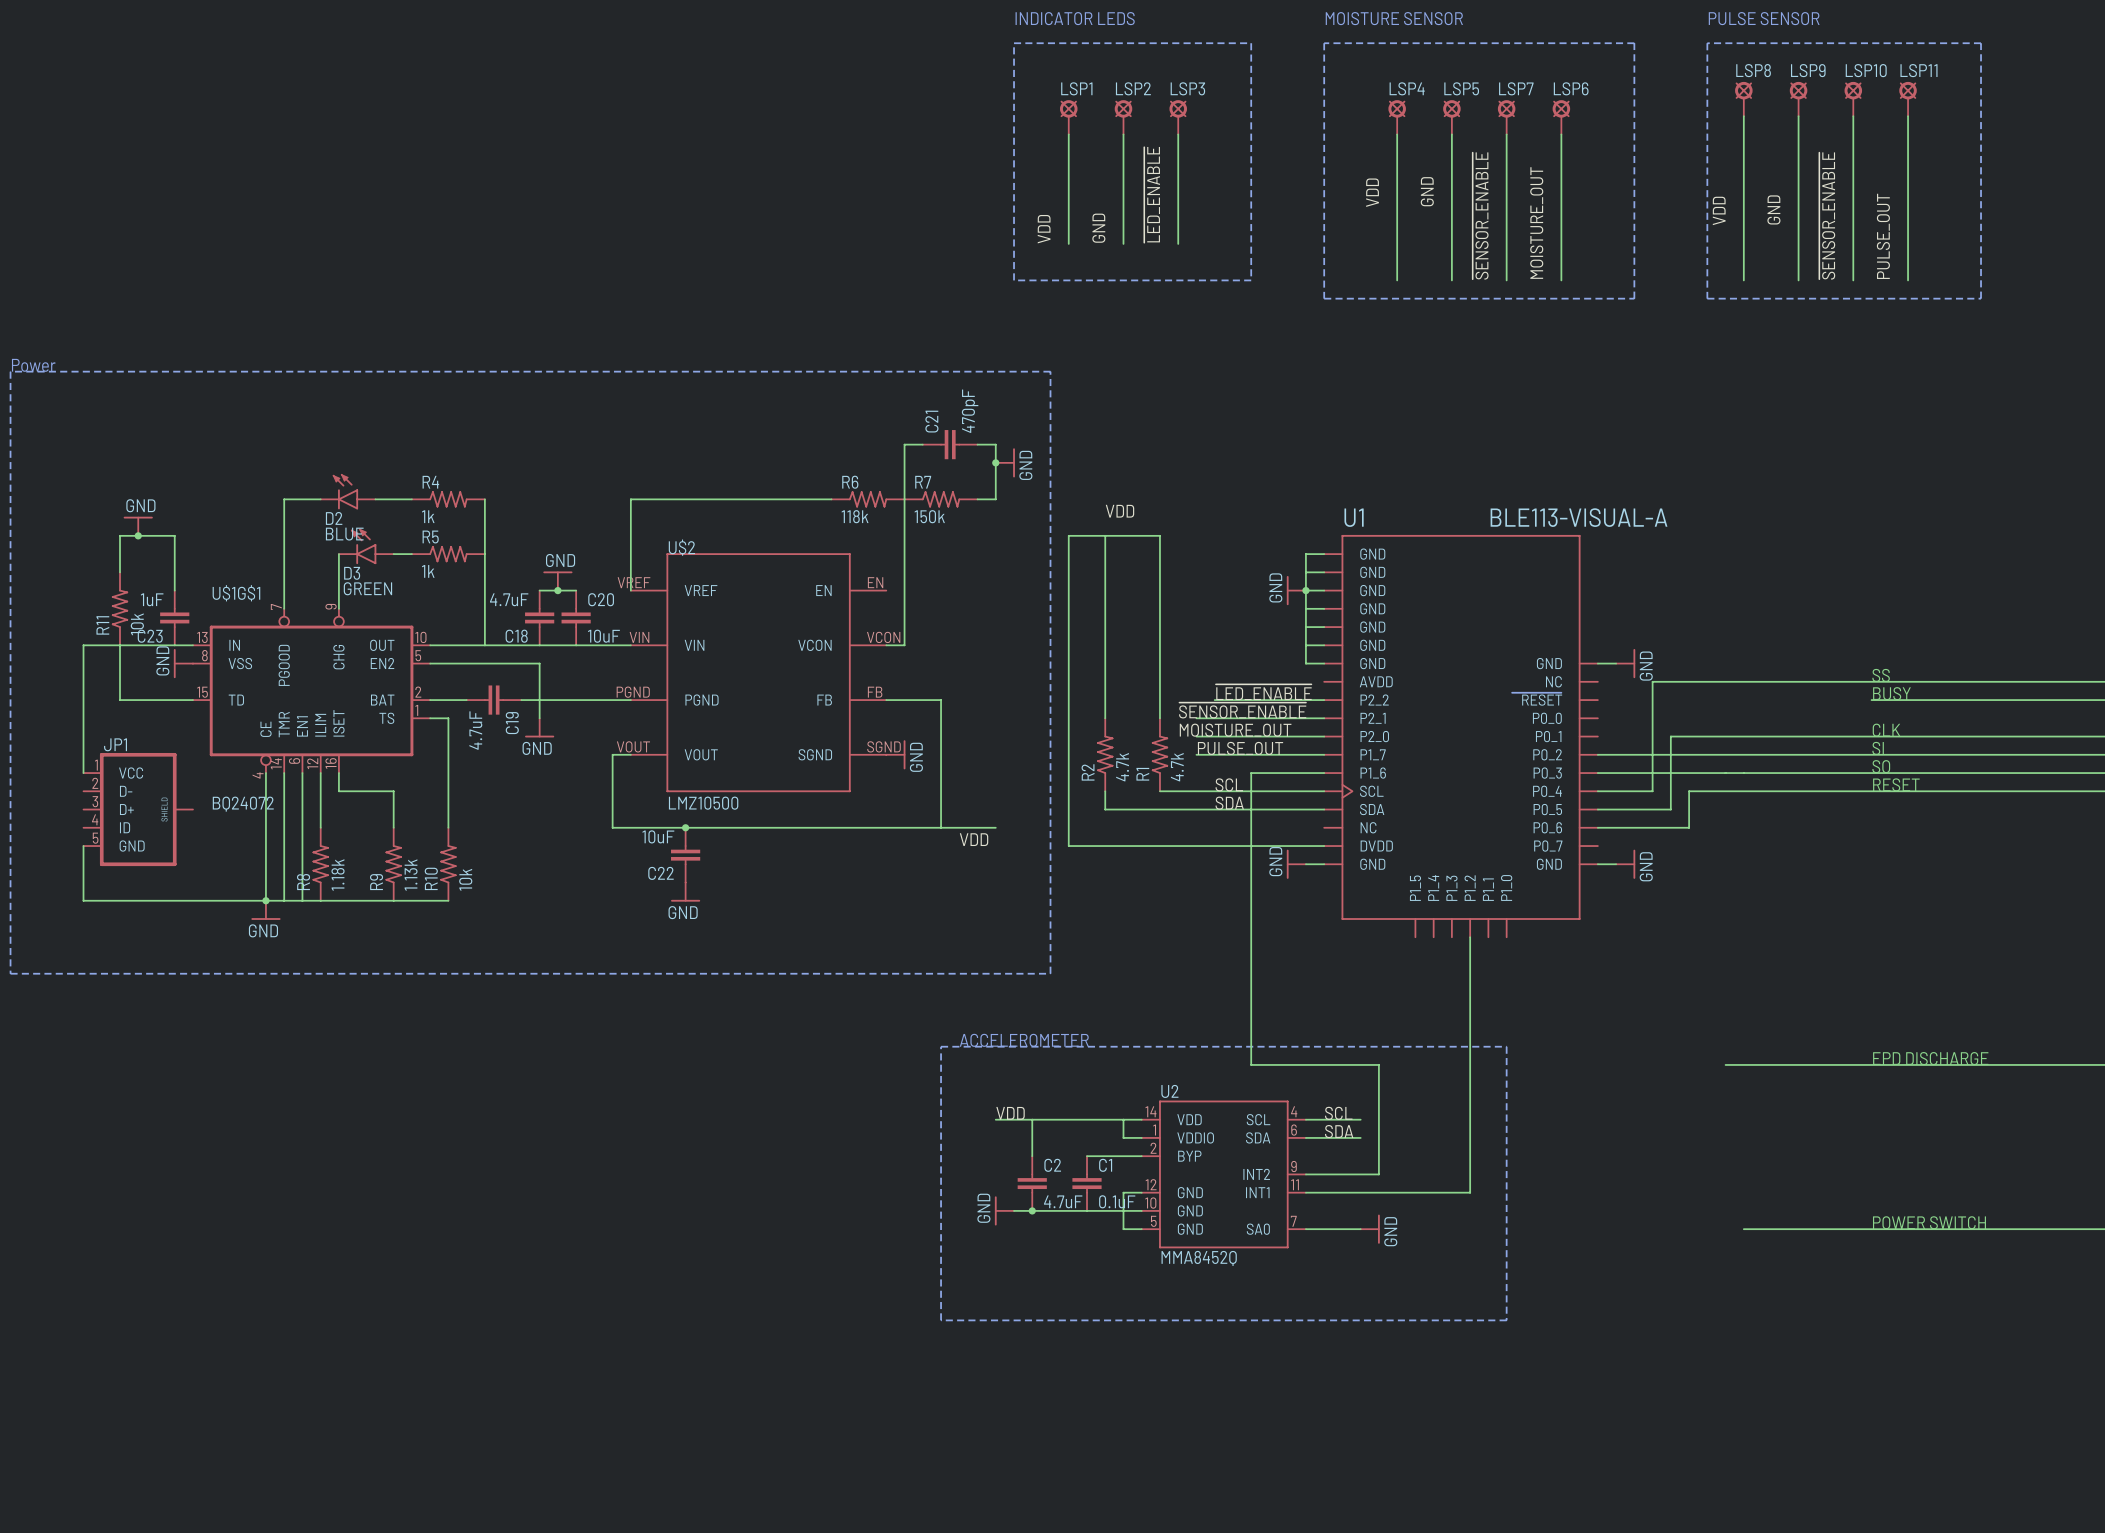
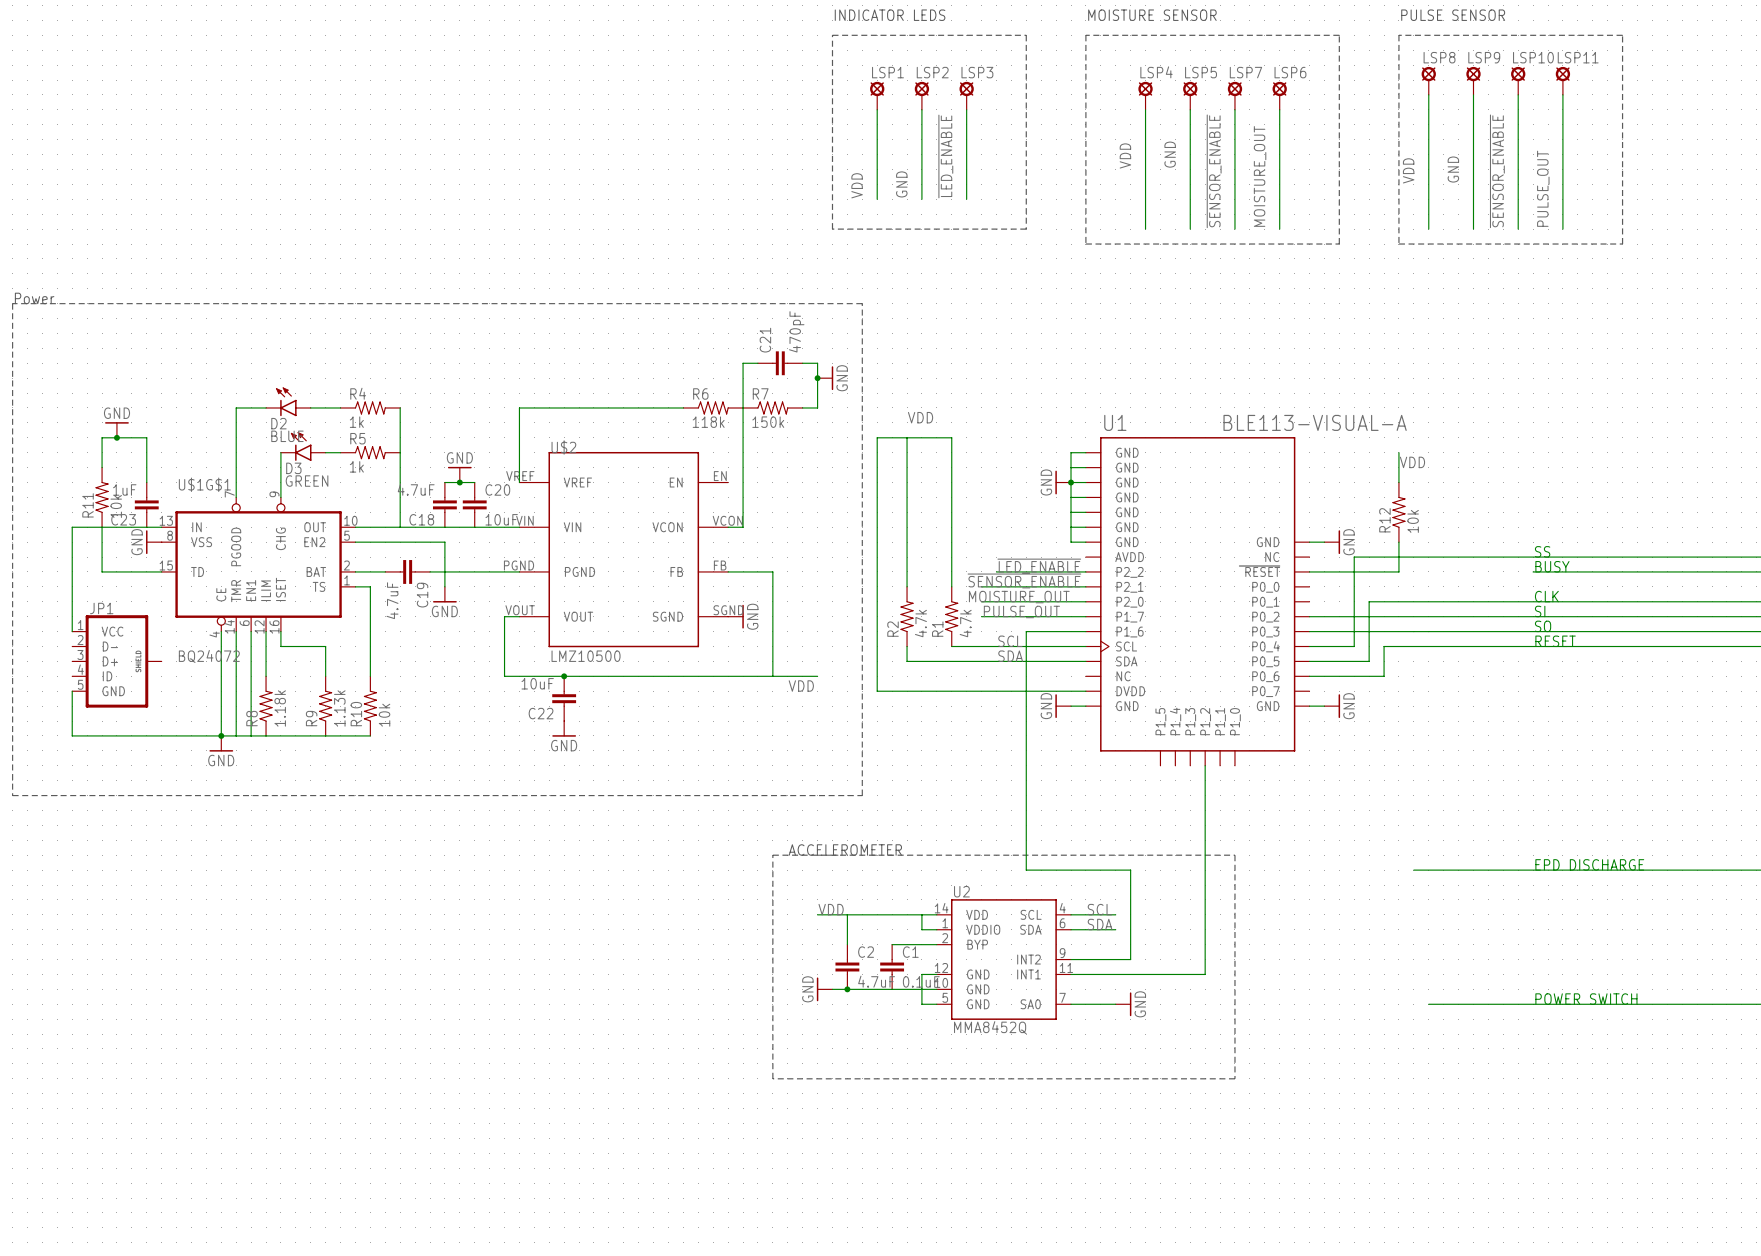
wire: none -> (1398, 452) (1398, 482)
label: none -> VDD (1412, 462)
R12: none -> 10k (1398, 512)
wire: none -> (1398, 542) (1398, 571) (1309, 571)

